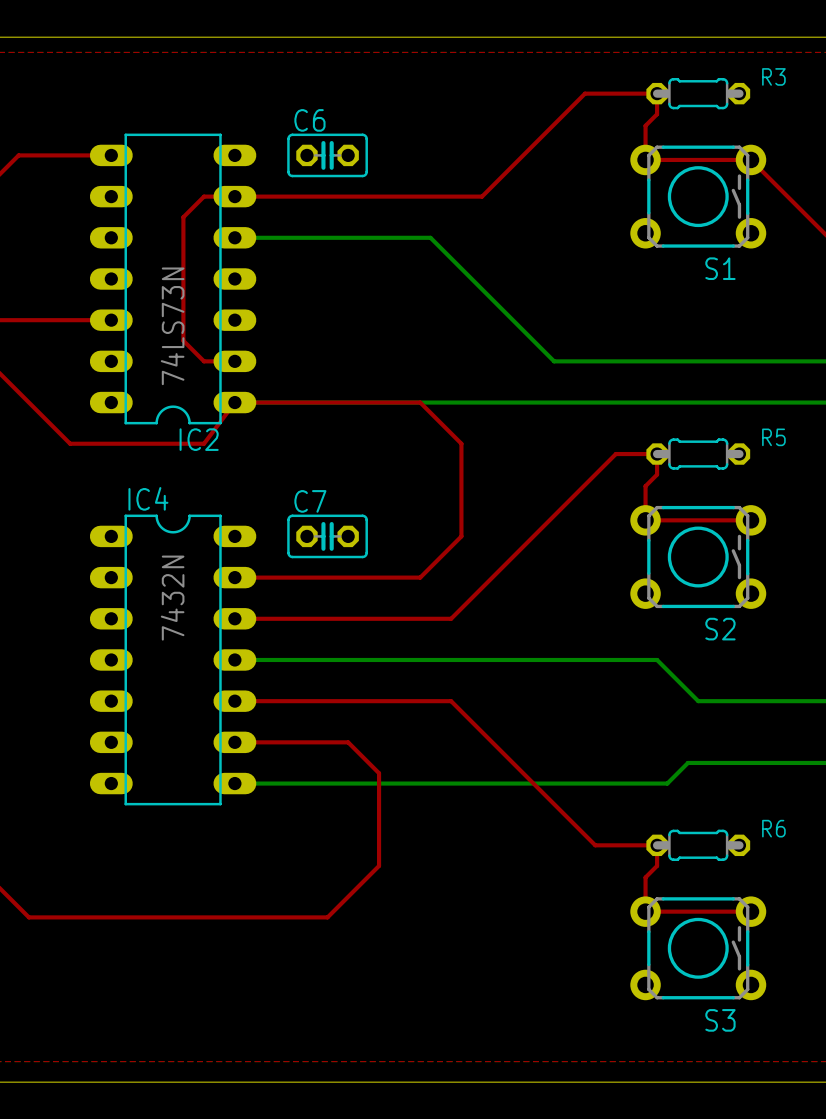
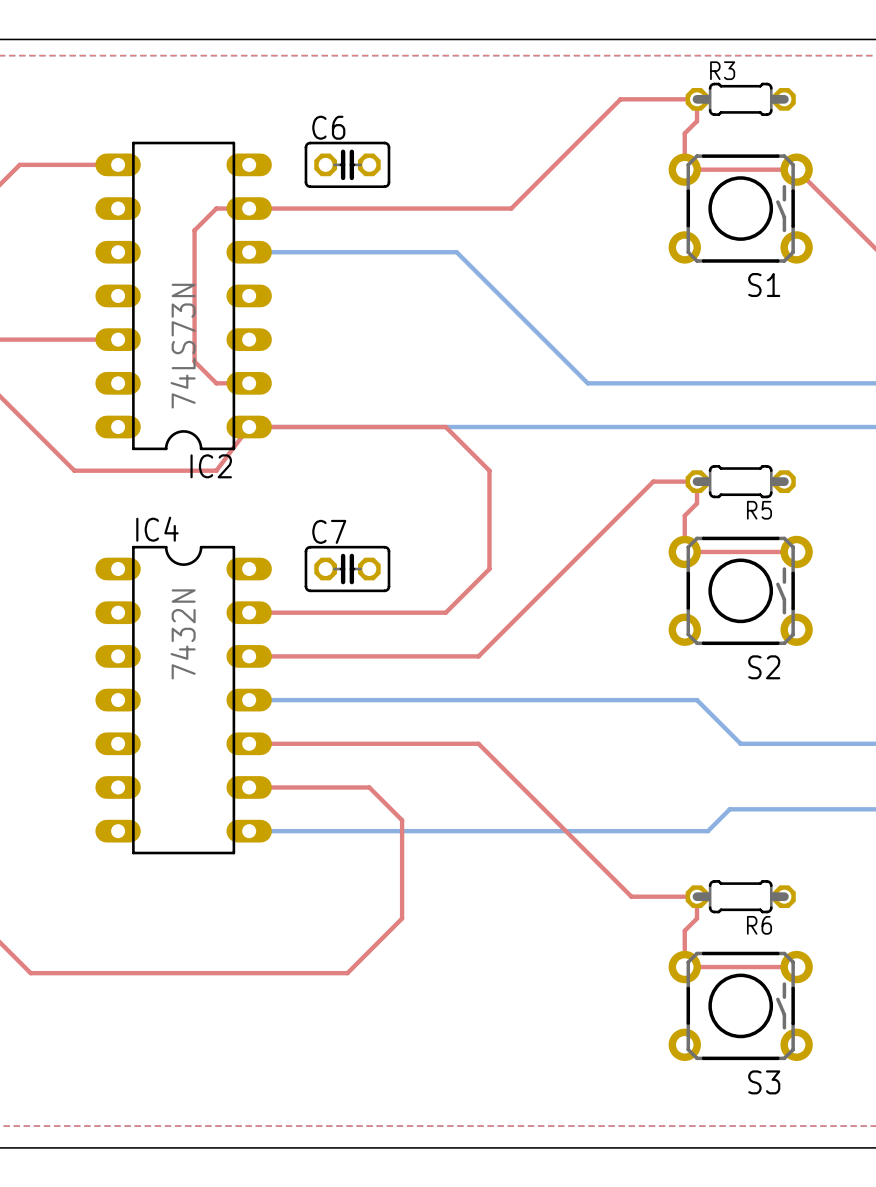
R3 name position: R3 (773, 76) -> R3 (722, 70)
R5 name position: R5 (773, 437) -> R5 (759, 510)
R6 name position: R6 (773, 828) -> R6 (759, 925)

